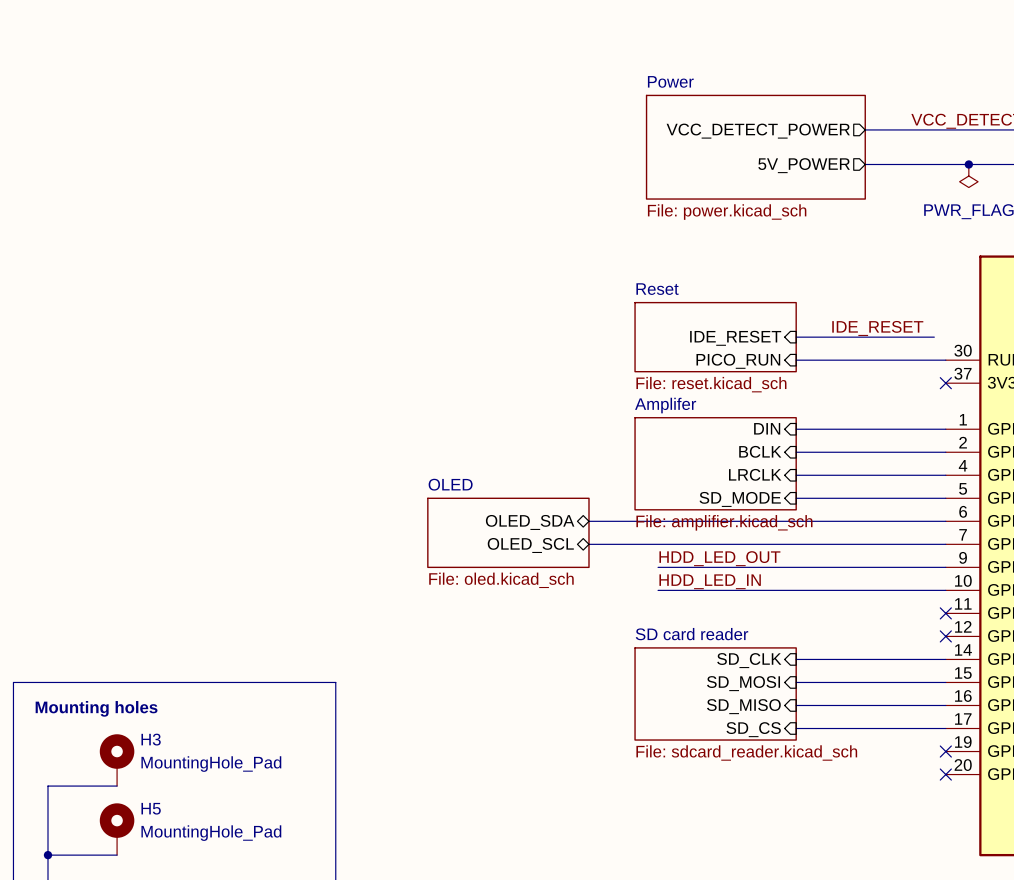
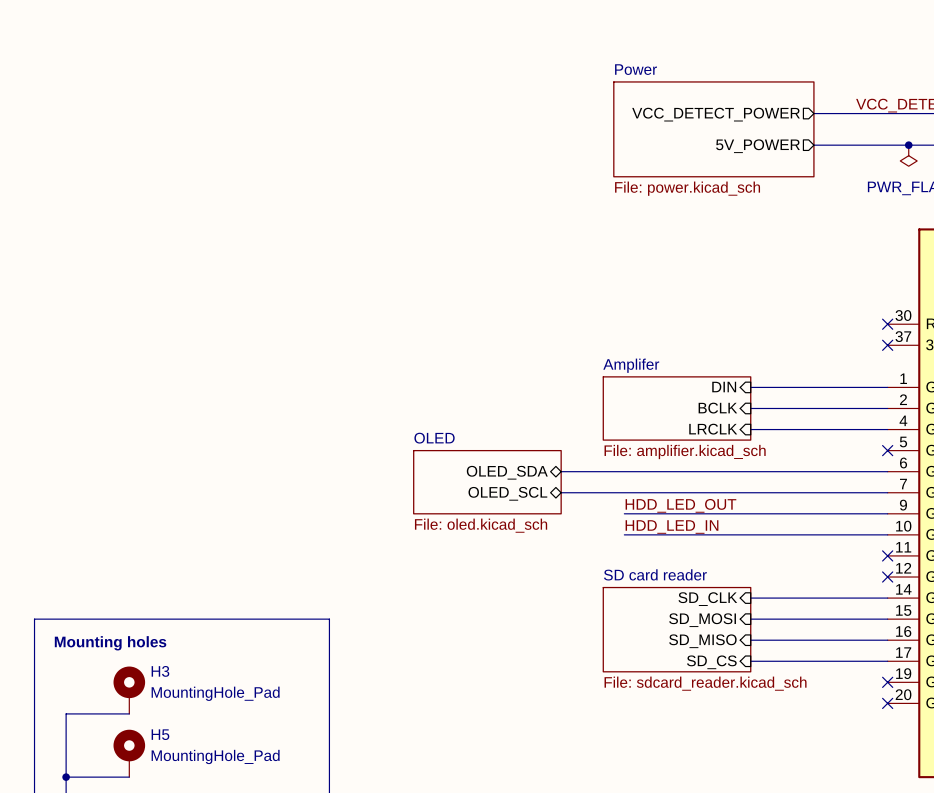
label: IDE_RESET (877, 328) -> none
sheet Reset: File: reset.kicad_sch (715, 337) -> none
wire: (796, 337) (934, 337) -> none
sheet pin: IDE_RESET (735, 338) -> none
wire: (796, 360) (945, 360) -> none
no-connect mark: none -> (887, 324)
sheet pin: PICO_RUN (738, 361) -> none
sheet Amplifer: none -> File: amplifier.kicad_sch (677, 408)
sheet Amplifer: File: amplifier.kicad_sch (715, 463) -> none
wire: (796, 498) (945, 498) -> none
no-connect mark: none -> (887, 450)
sheet pin: SD_MODE (740, 499) -> none

